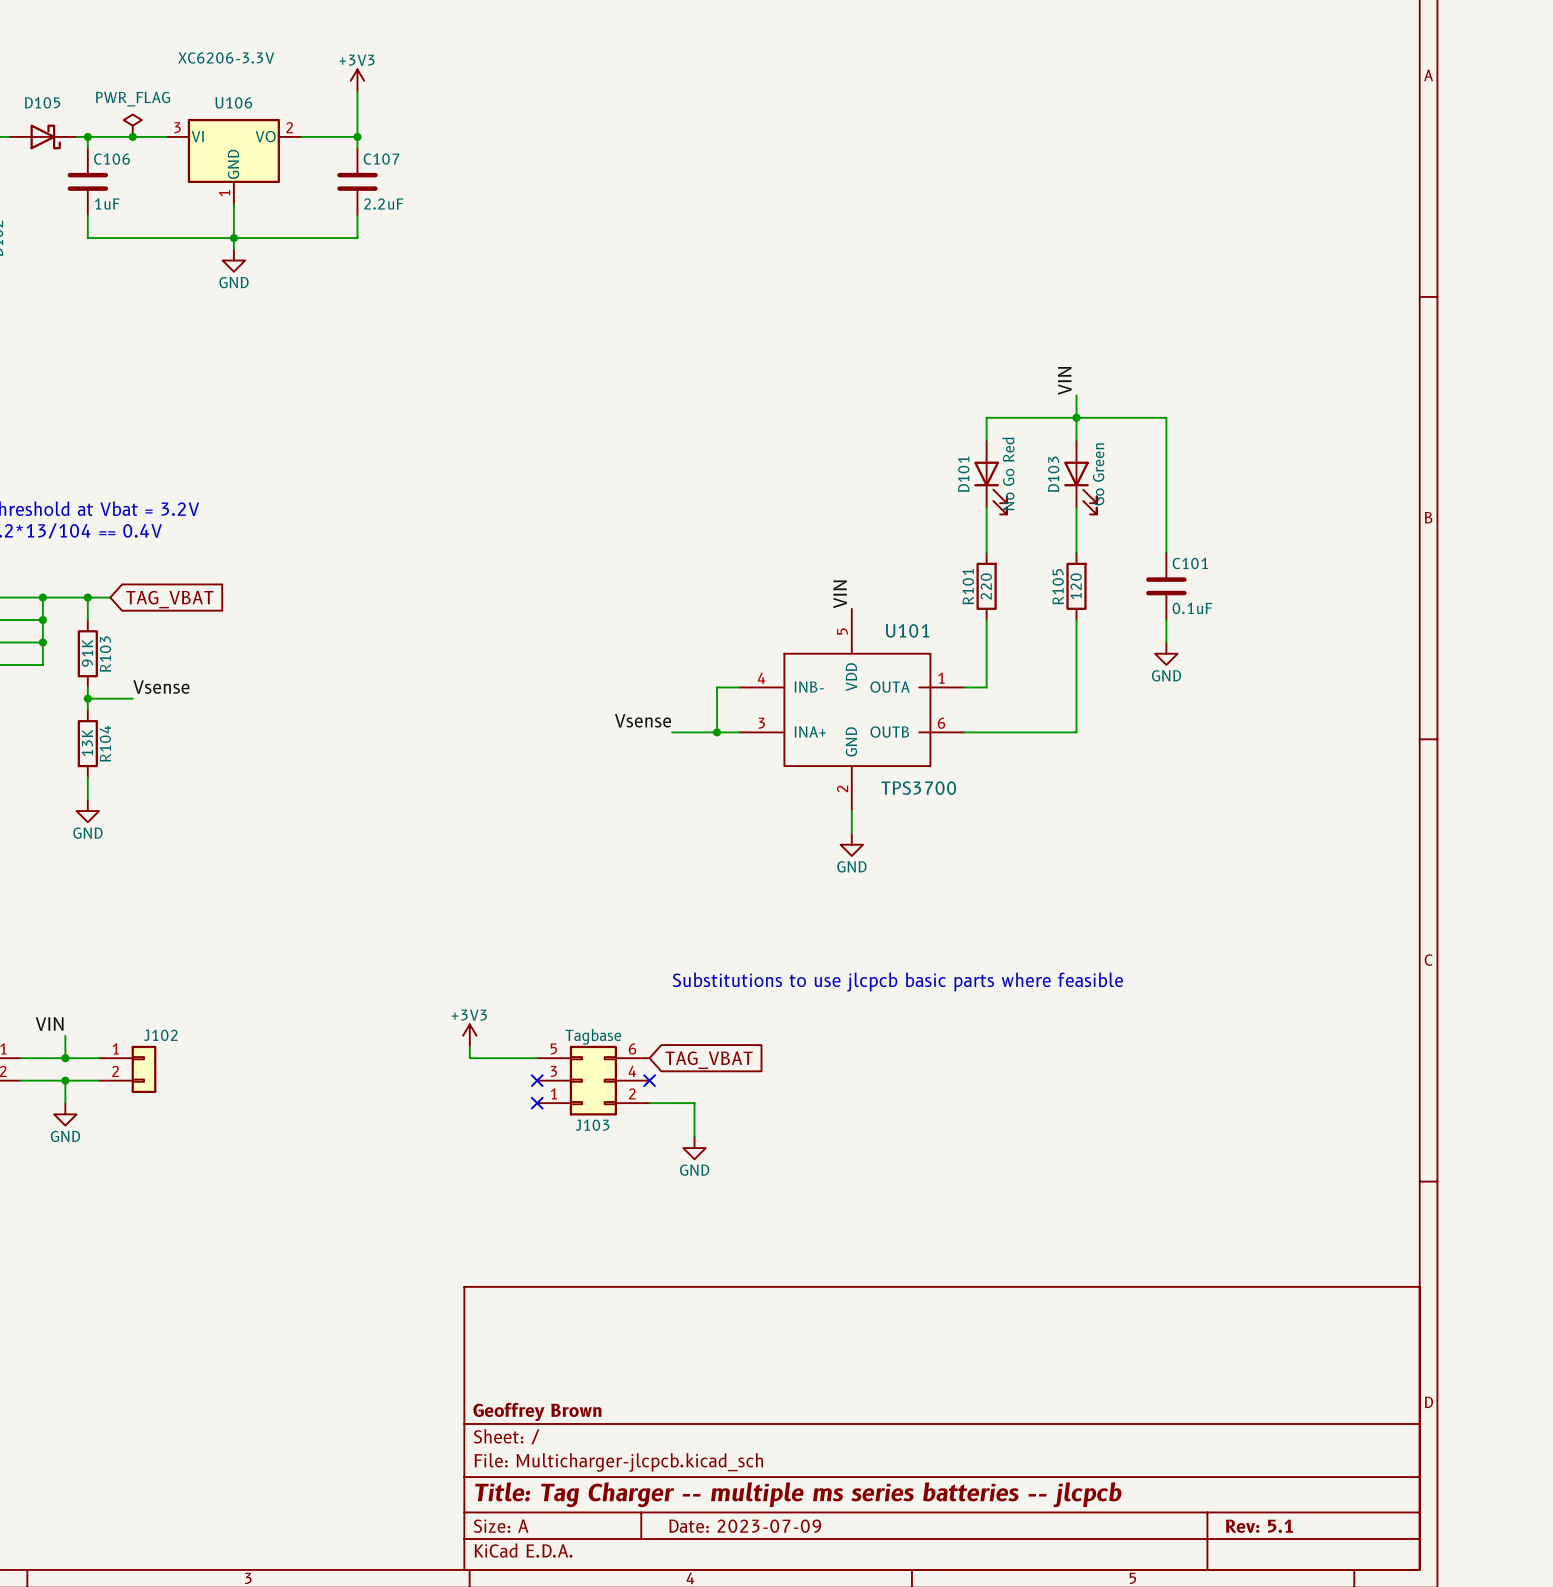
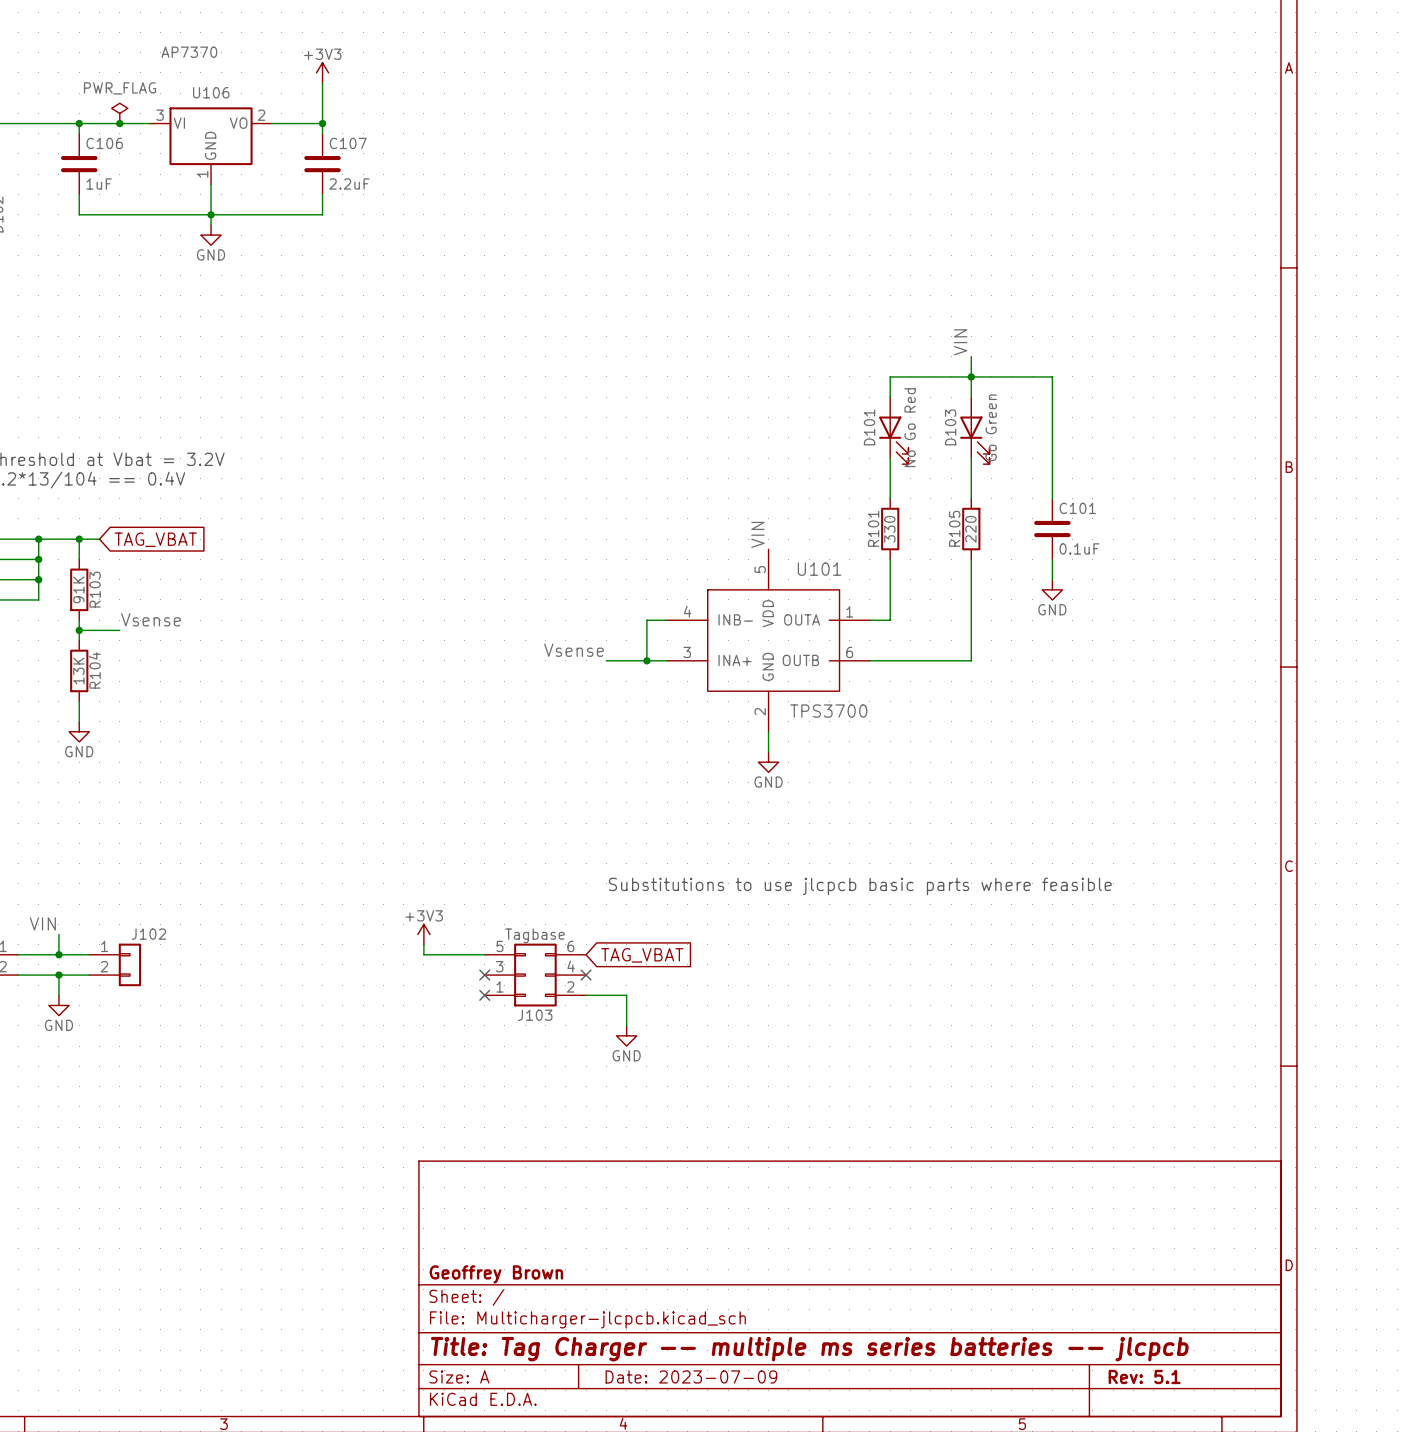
U106 value: XC6206-3.3V (226, 57) -> AP7370 (189, 52)
D105: (42, 136) -> none
R101 value: 220 (986, 586) -> 330 (889, 529)
R105 value: 120 (1076, 586) -> 220 (970, 529)

